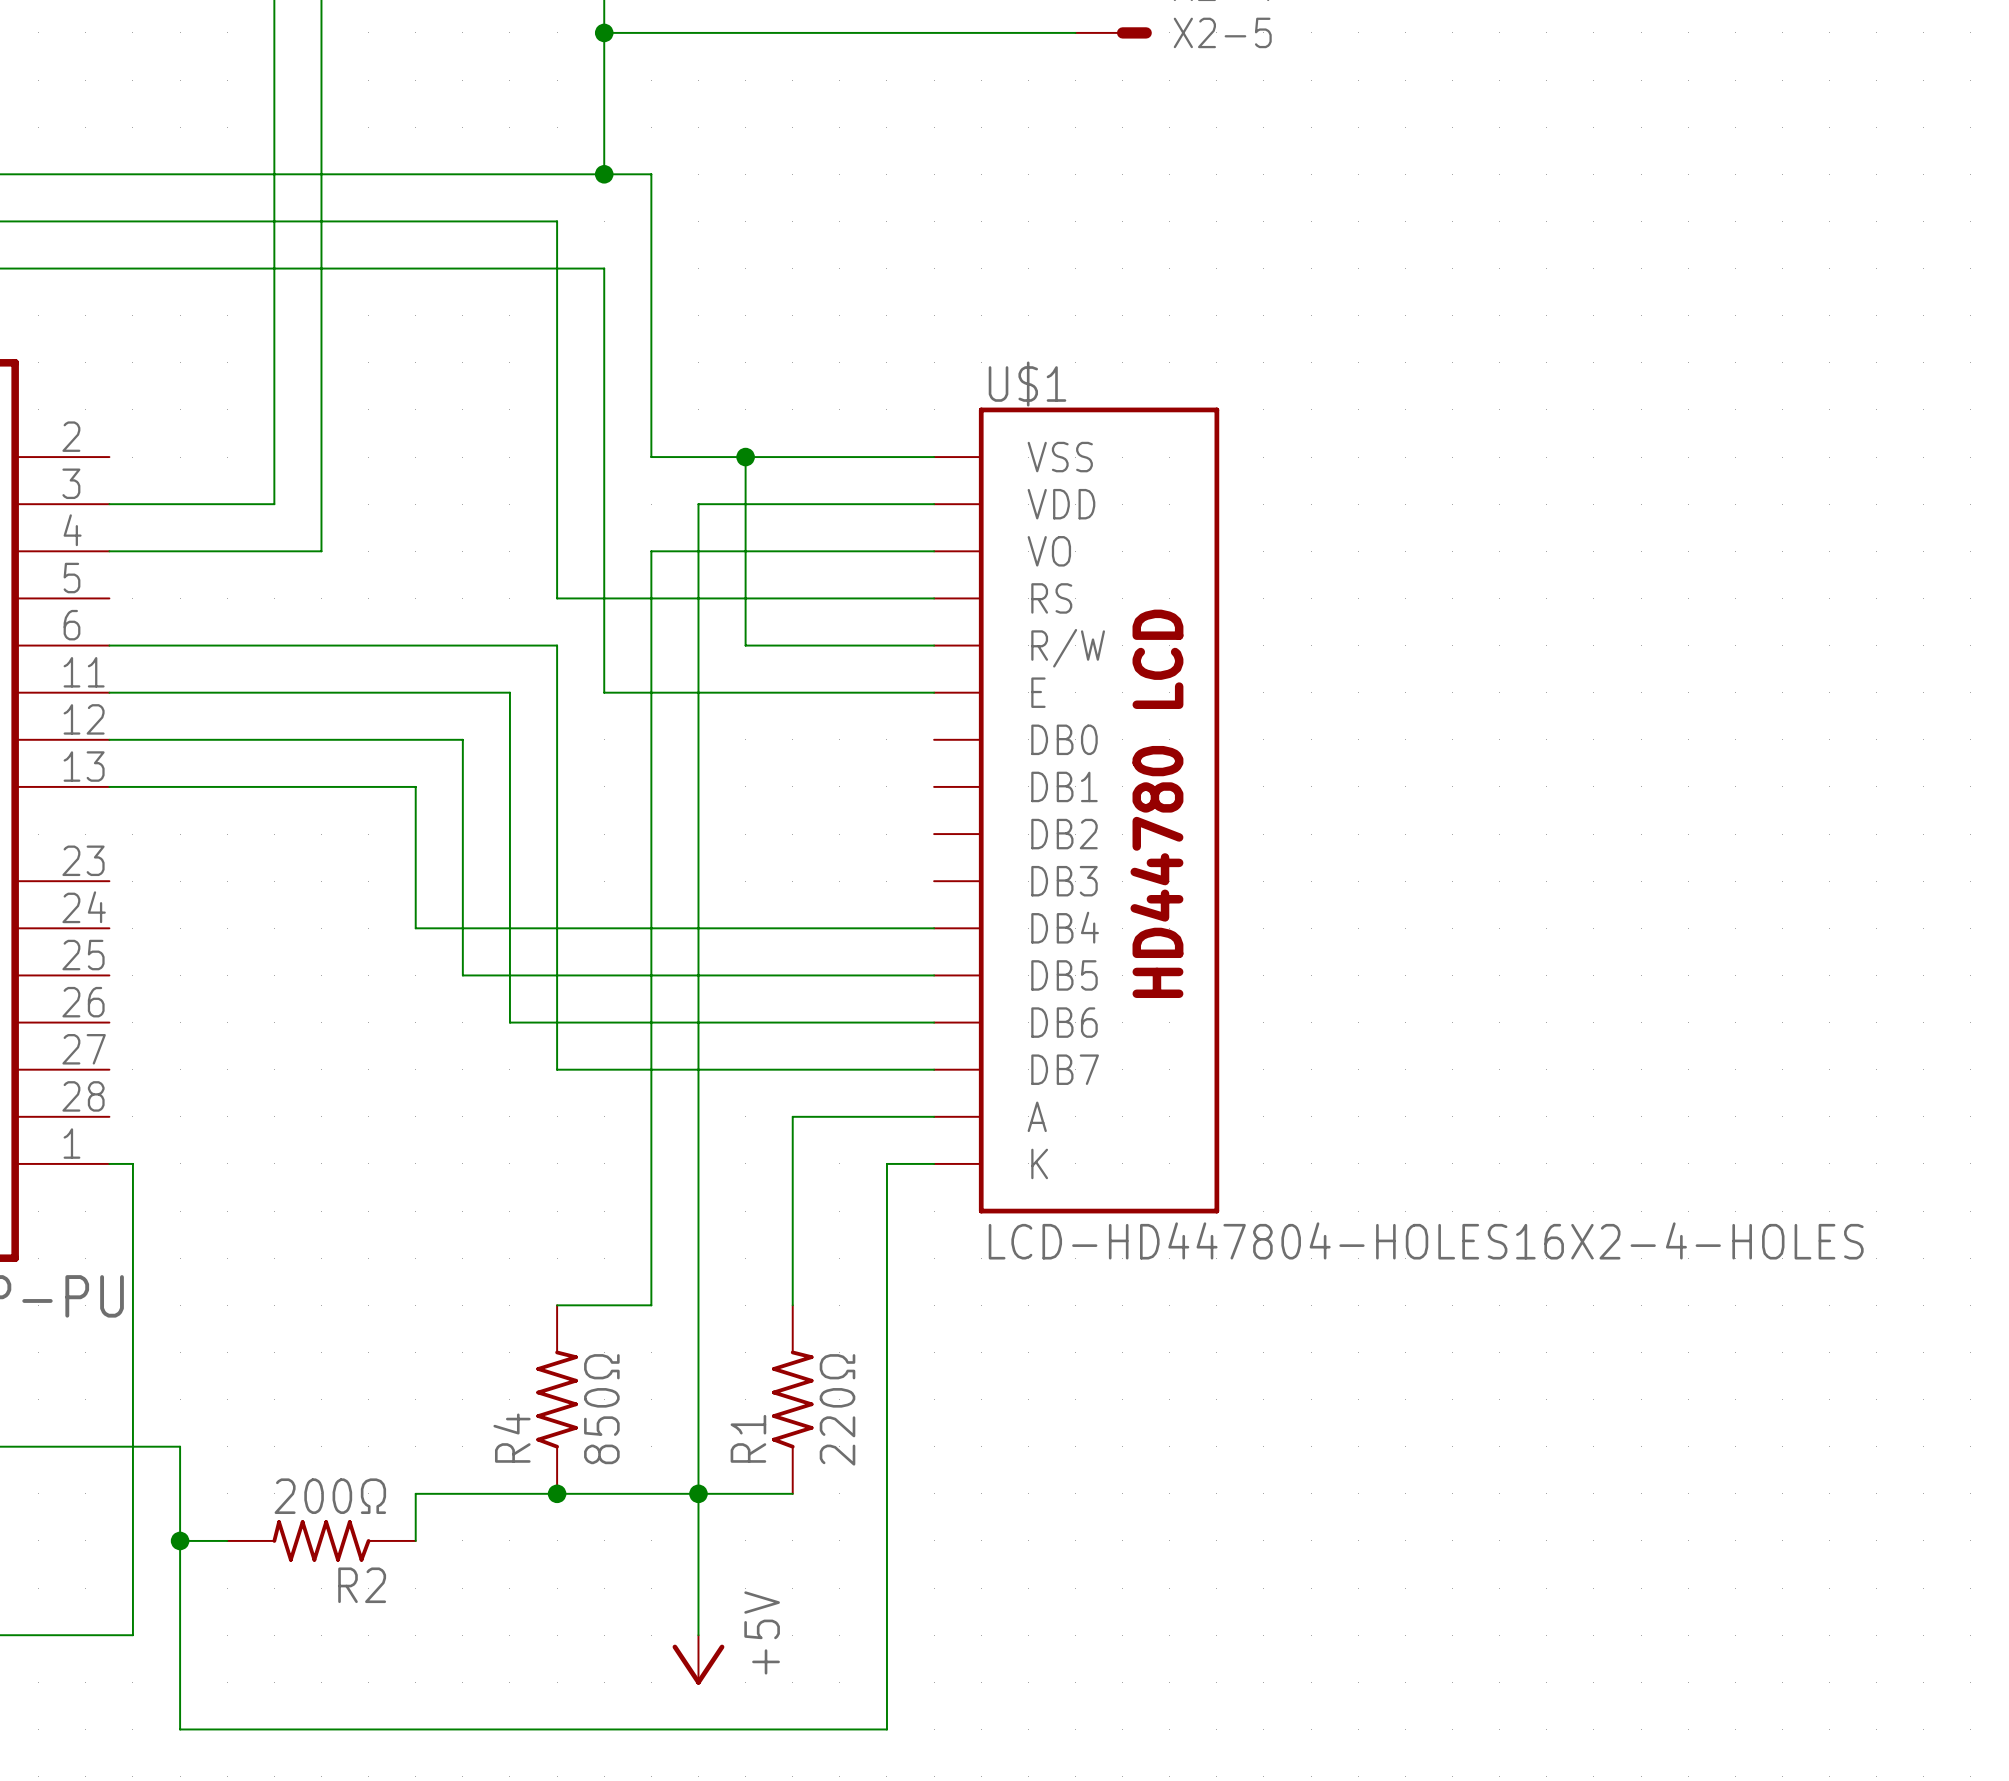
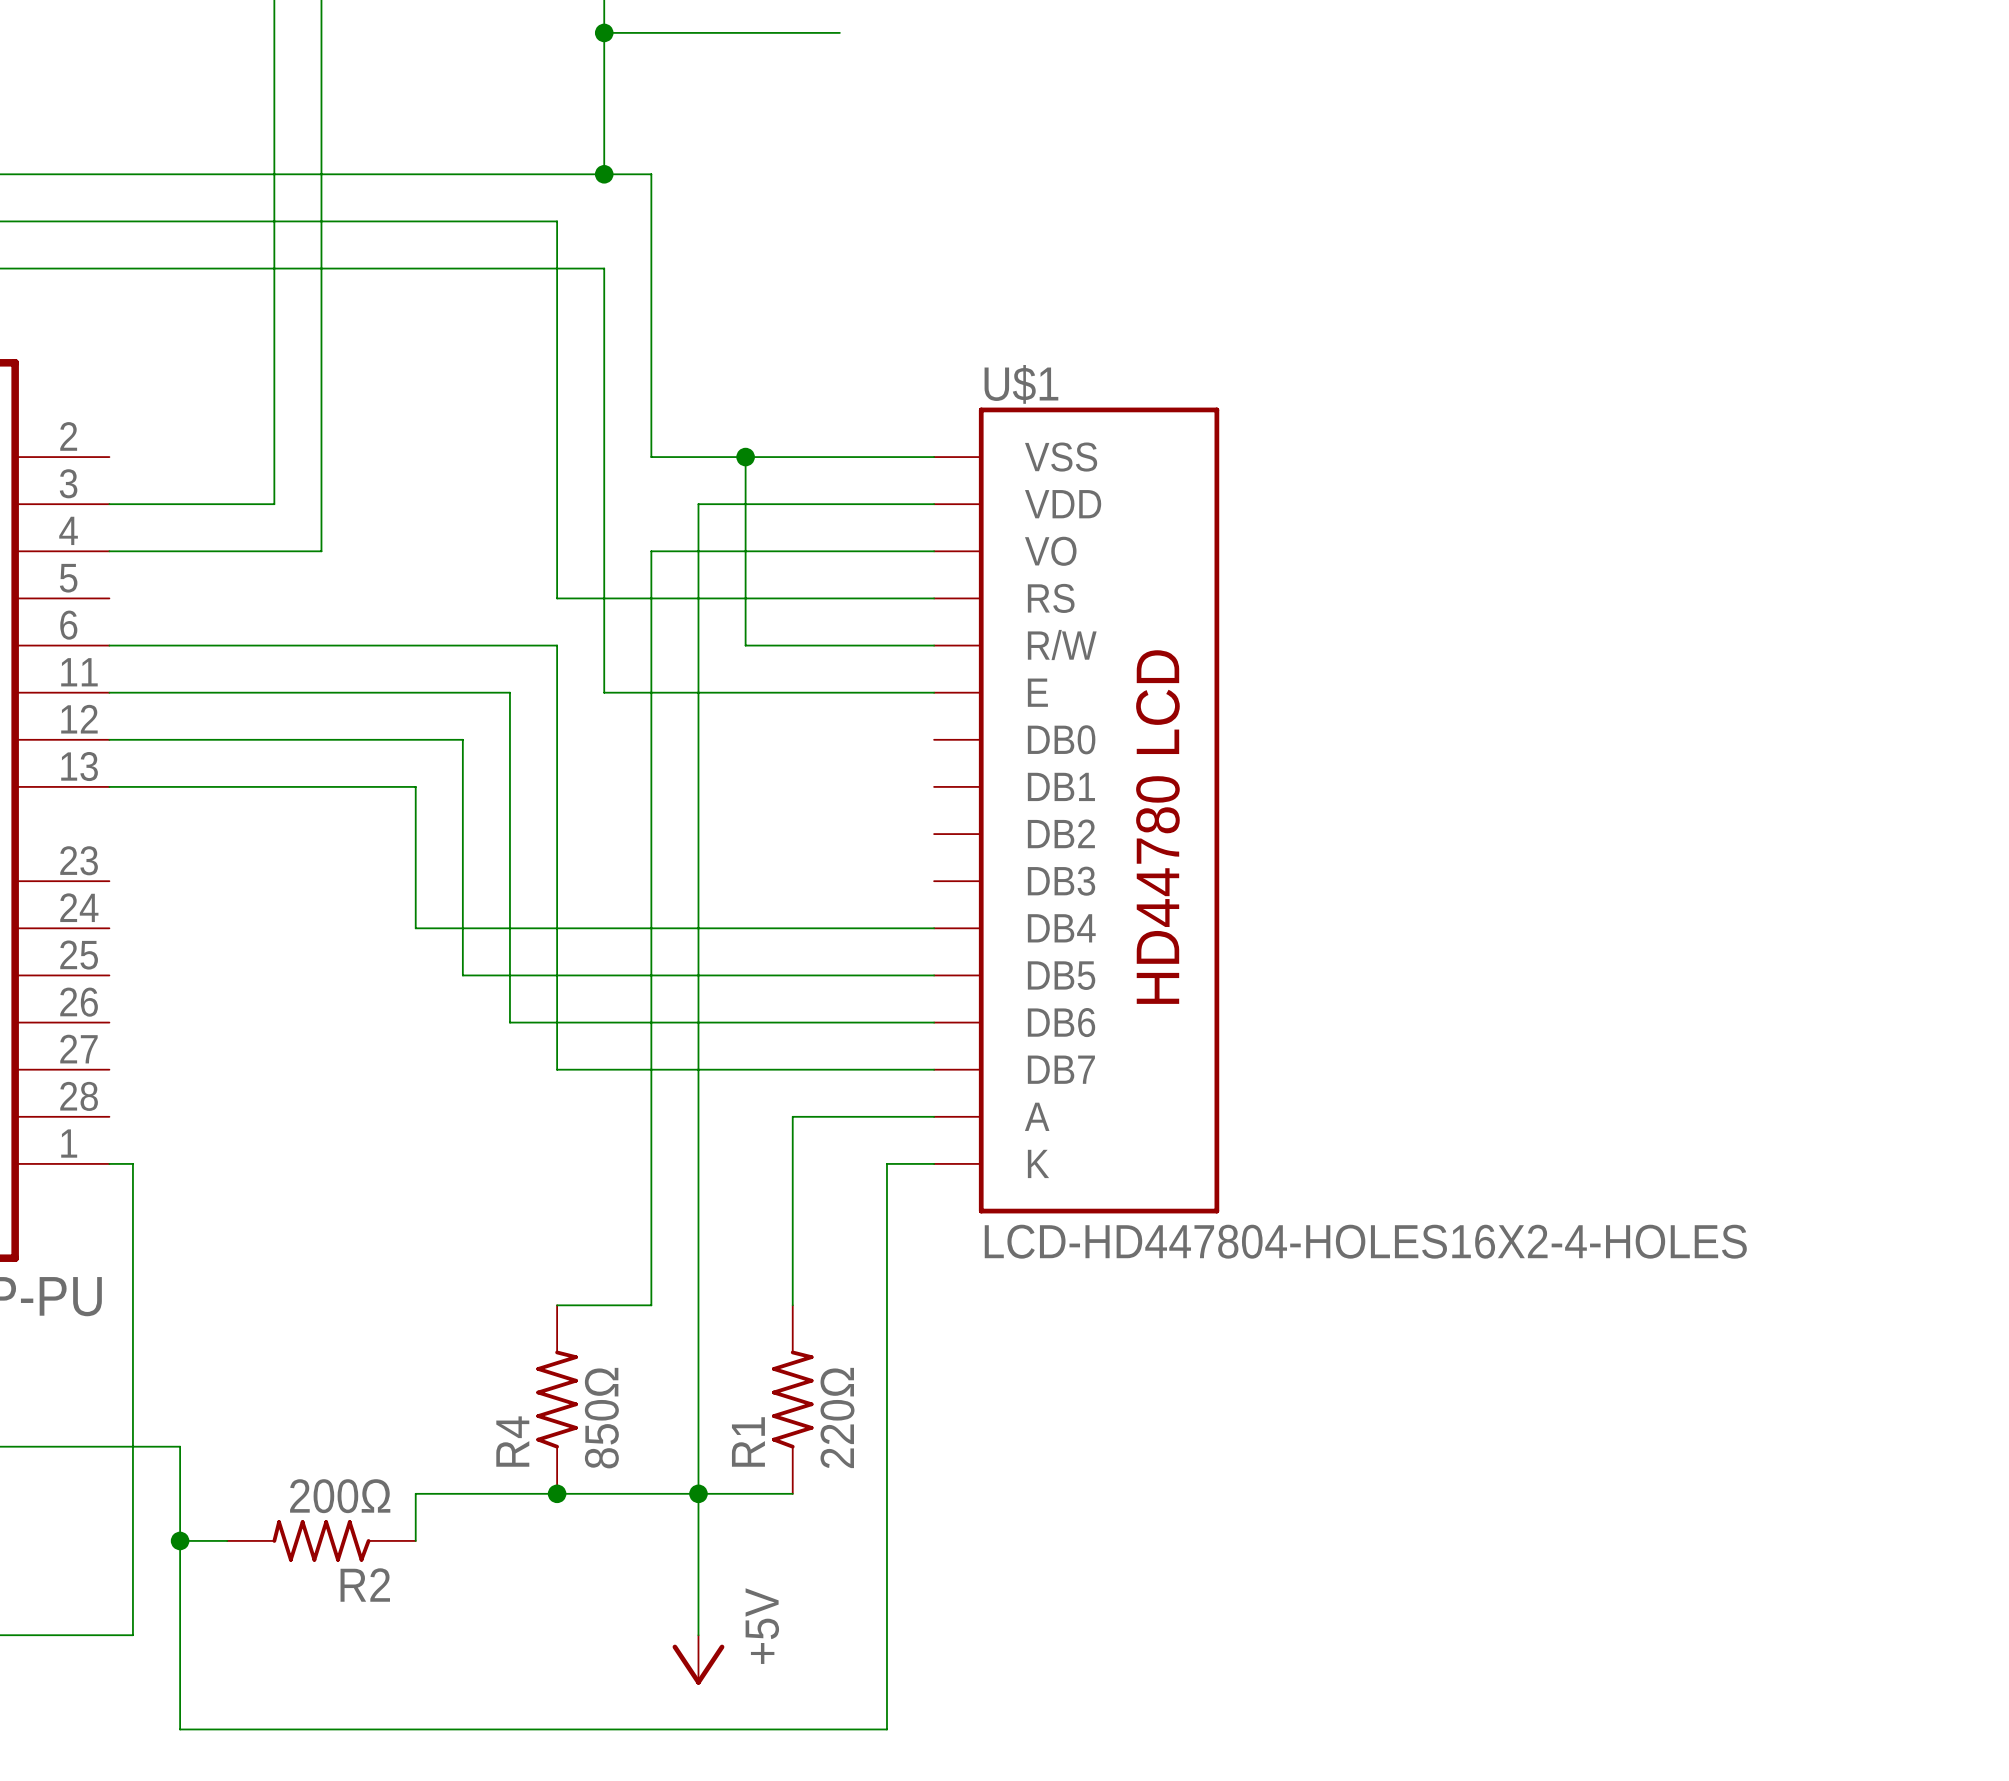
wire: (839, 32) (1075, 32) -> none
X2-5: (1113, 32) -> none

